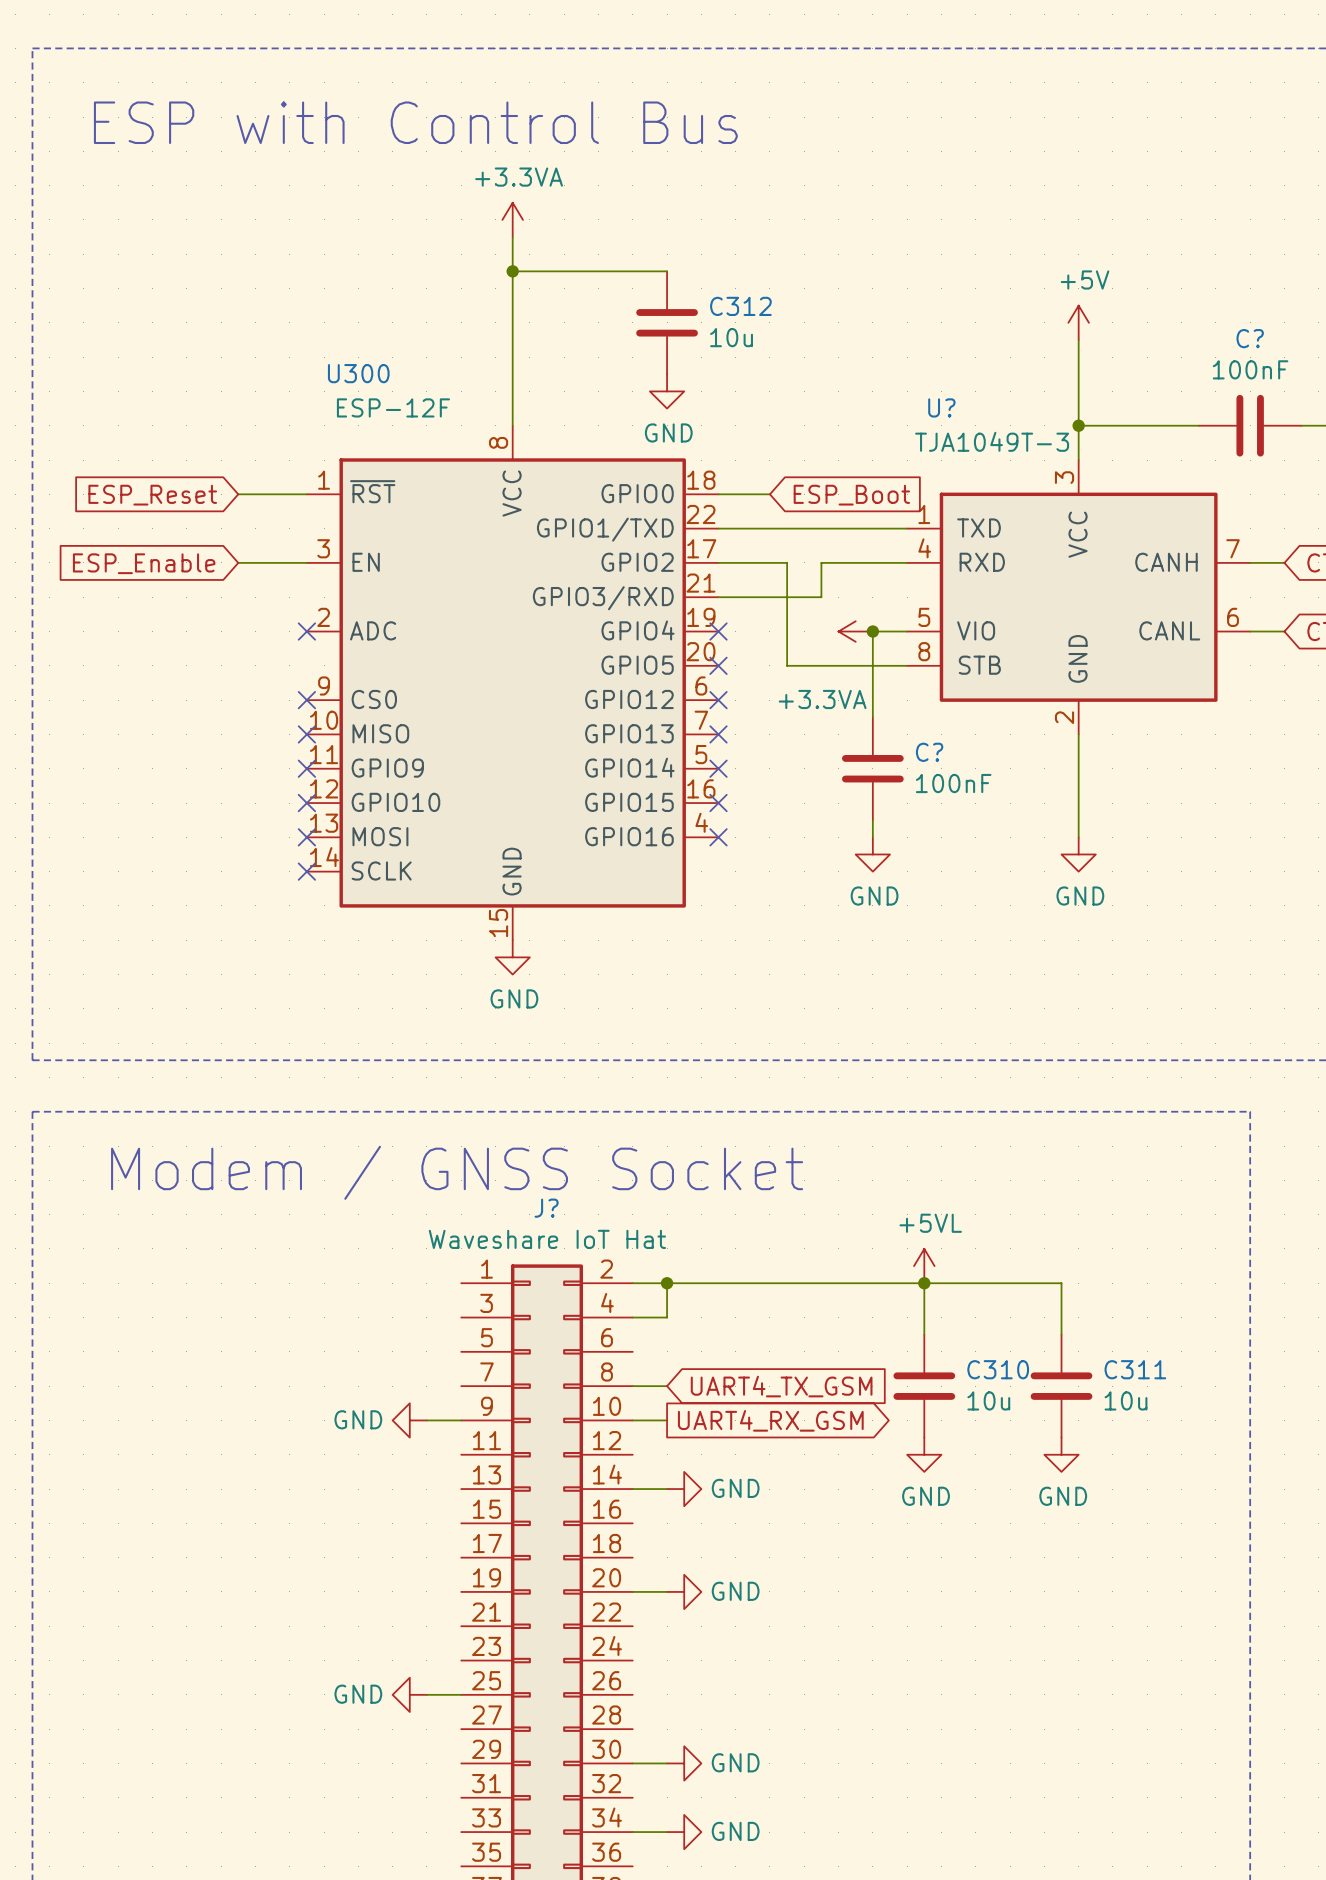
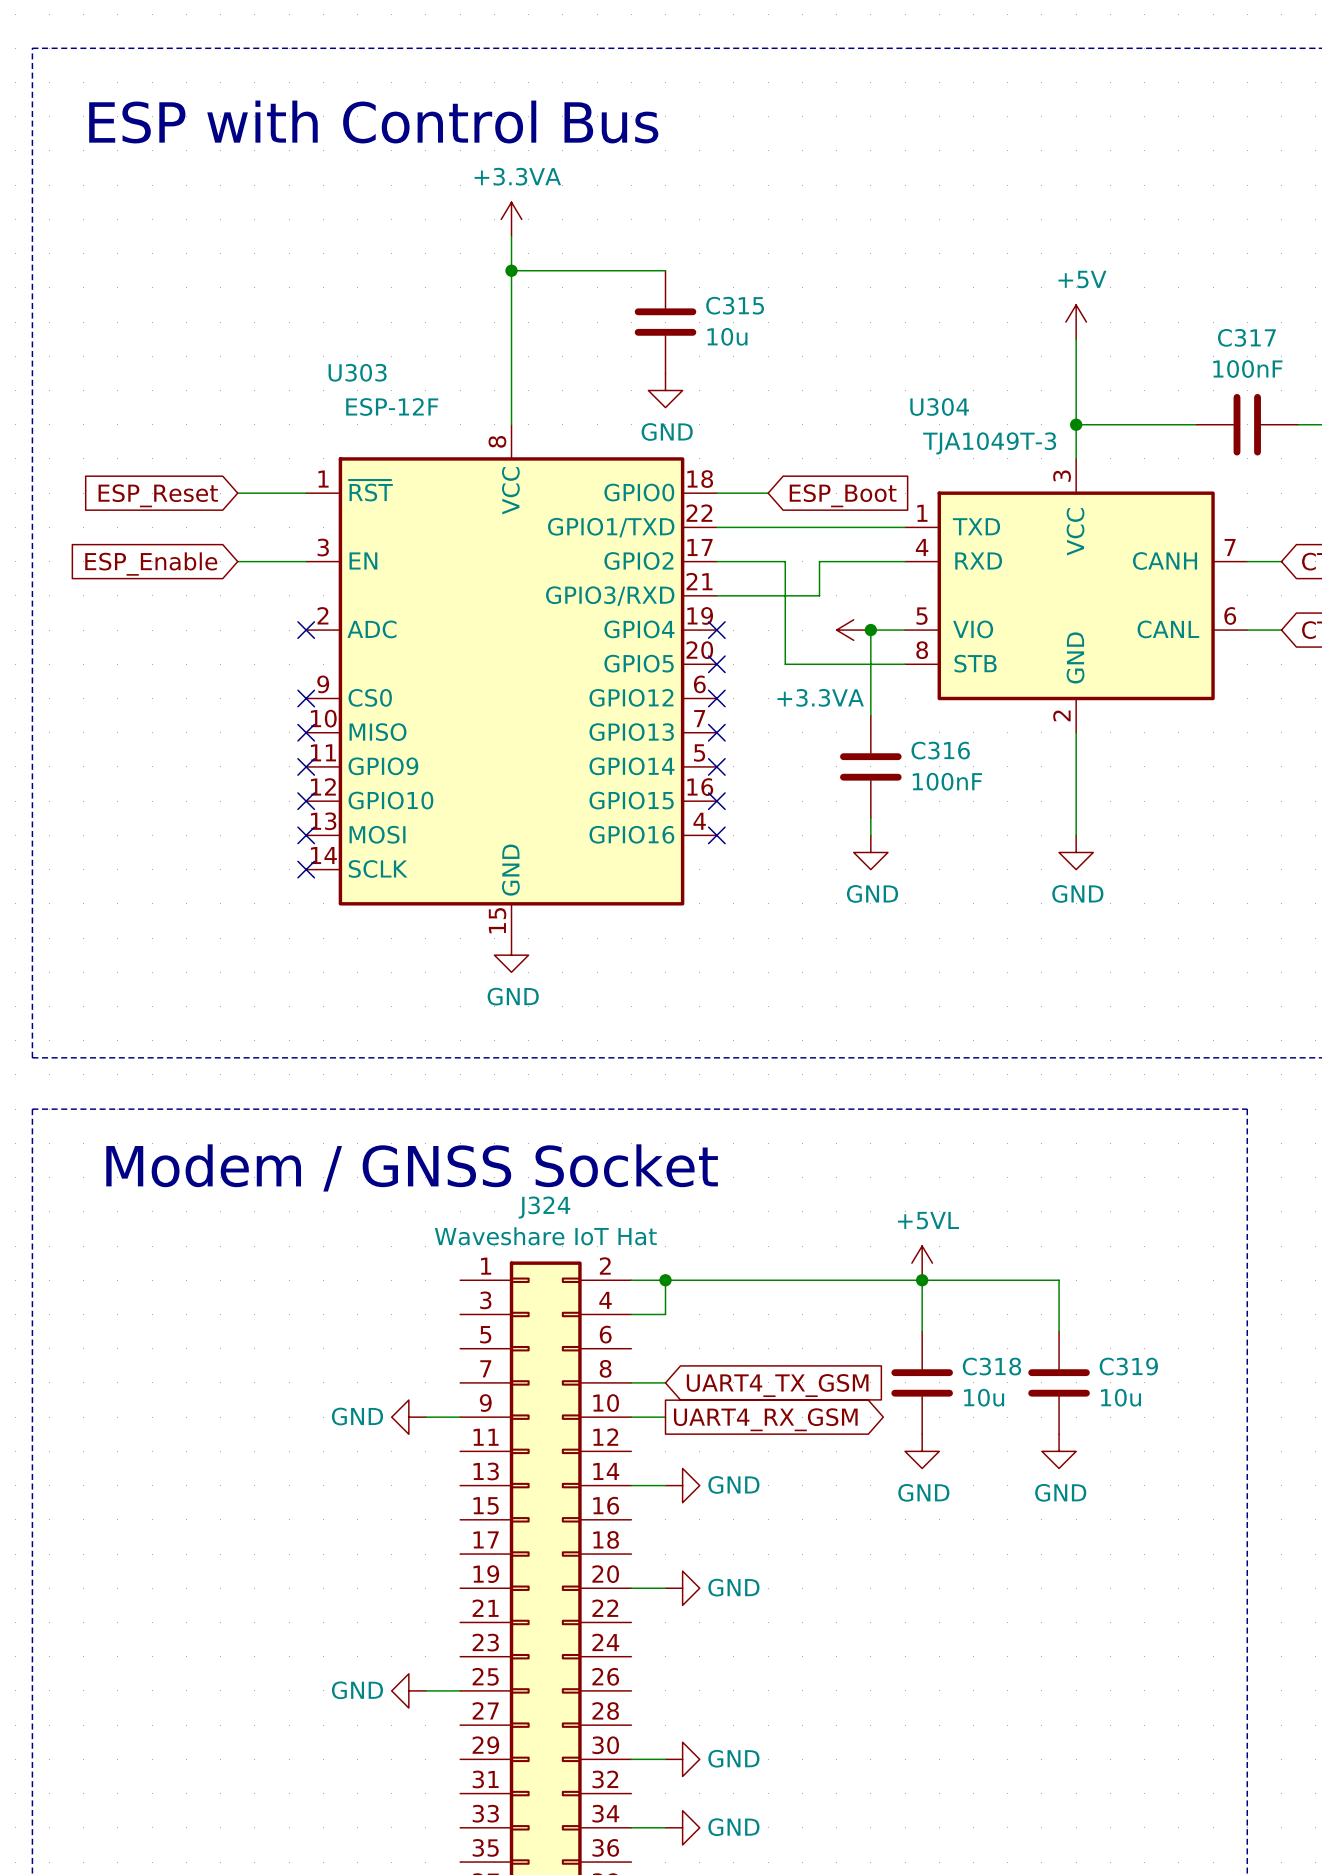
C312 name: C312 (740, 306) -> C315 (735, 305)
C? name: C? (1250, 338) -> C317 (1246, 337)
U300 name: U300 (358, 373) -> U303 (357, 372)
U? name: U? (941, 407) -> U304 (939, 406)
C? name: C? (929, 752) -> C316 (940, 750)
J? name: J? (546, 1208) -> J324 (544, 1207)
C310 name: C310 (998, 1369) -> C318 (991, 1366)
C311 name: C311 (1135, 1369) -> C319 (1128, 1366)

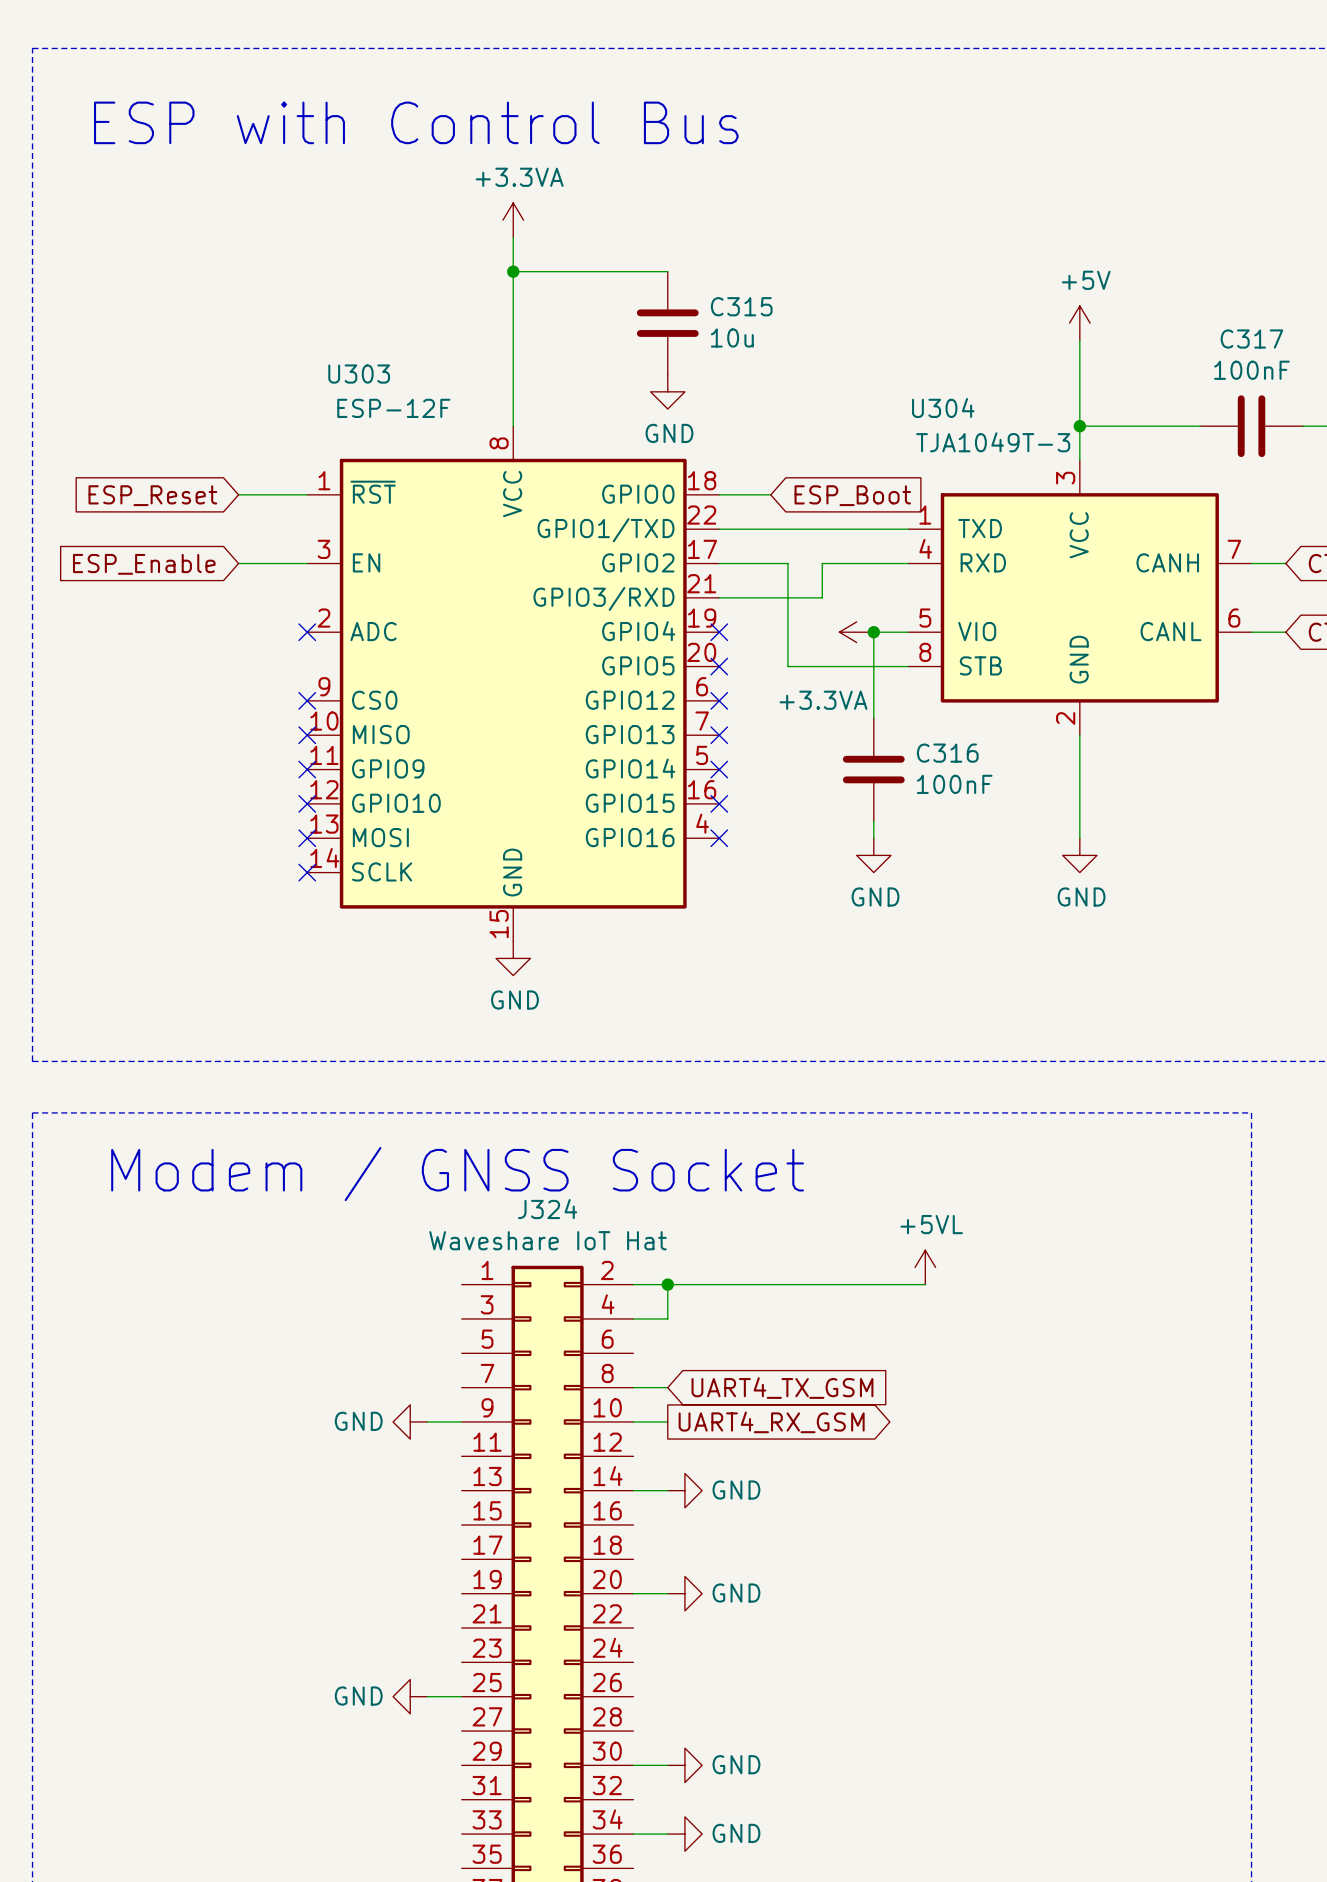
junction: (922, 1280) -> none
wire: (922, 1331) (922, 1280) (1059, 1280) (1059, 1331) -> none
C318: 10u (922, 1382) -> none
C319: 10u (1059, 1382) -> none
power symbol: GND (922, 1451) -> none
power symbol: GND (1059, 1451) -> none

